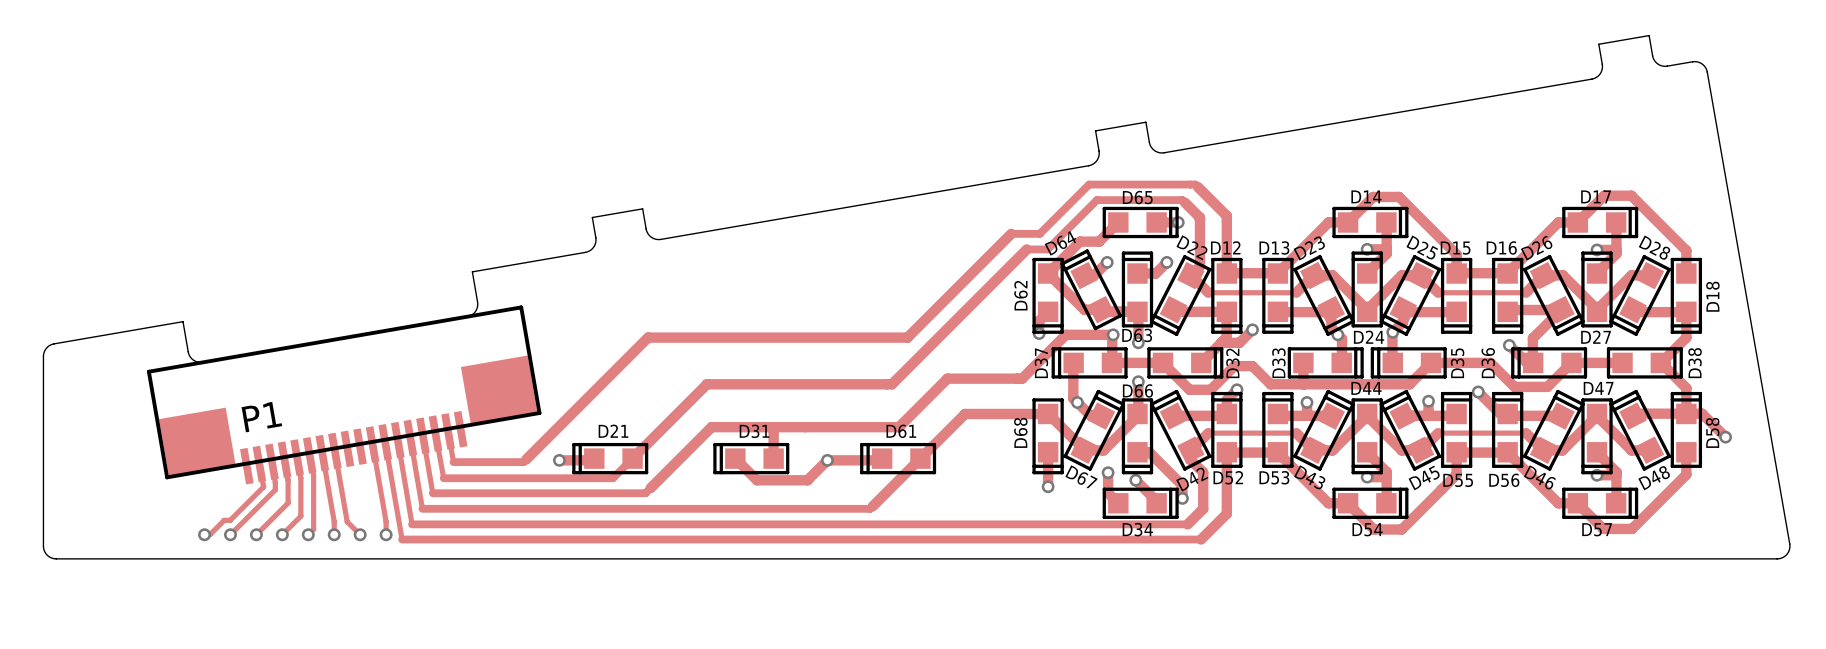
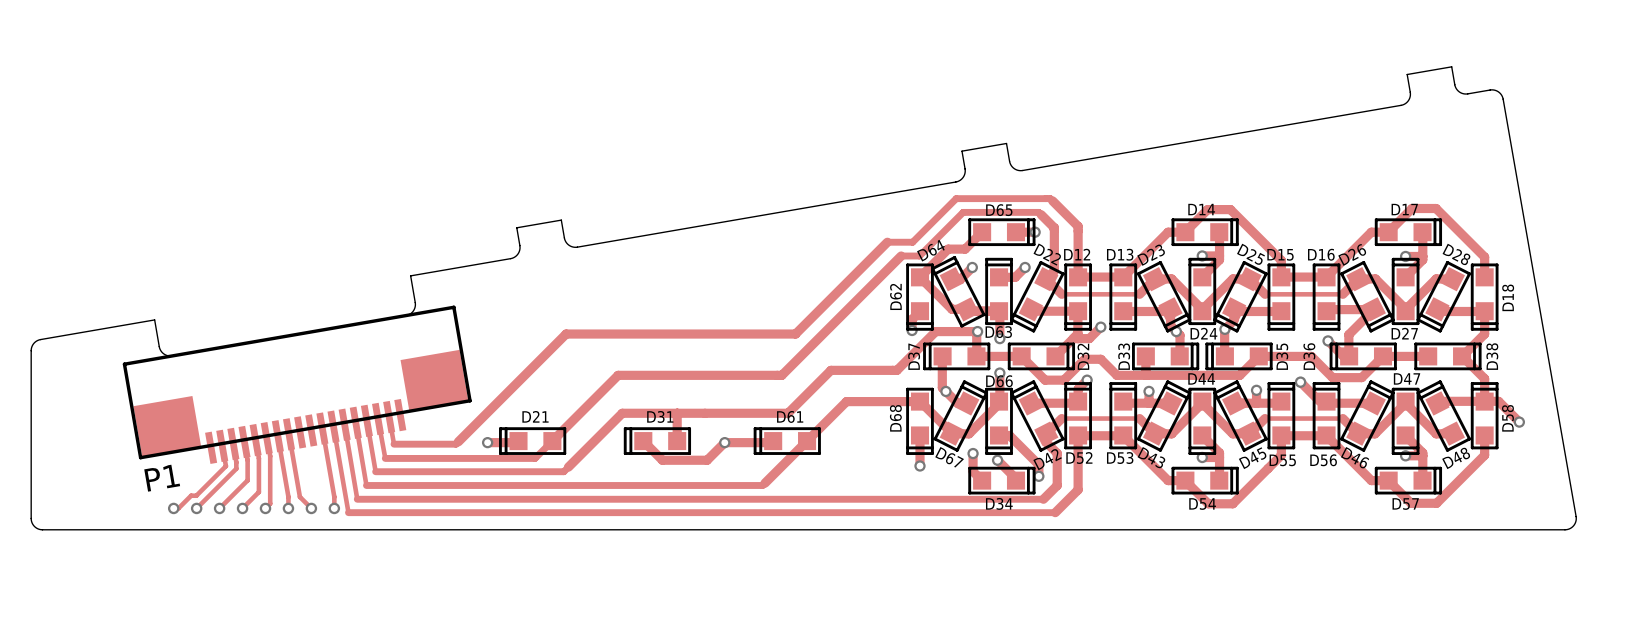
P1 name position: P1 (261, 417) -> P1 (162, 478)

